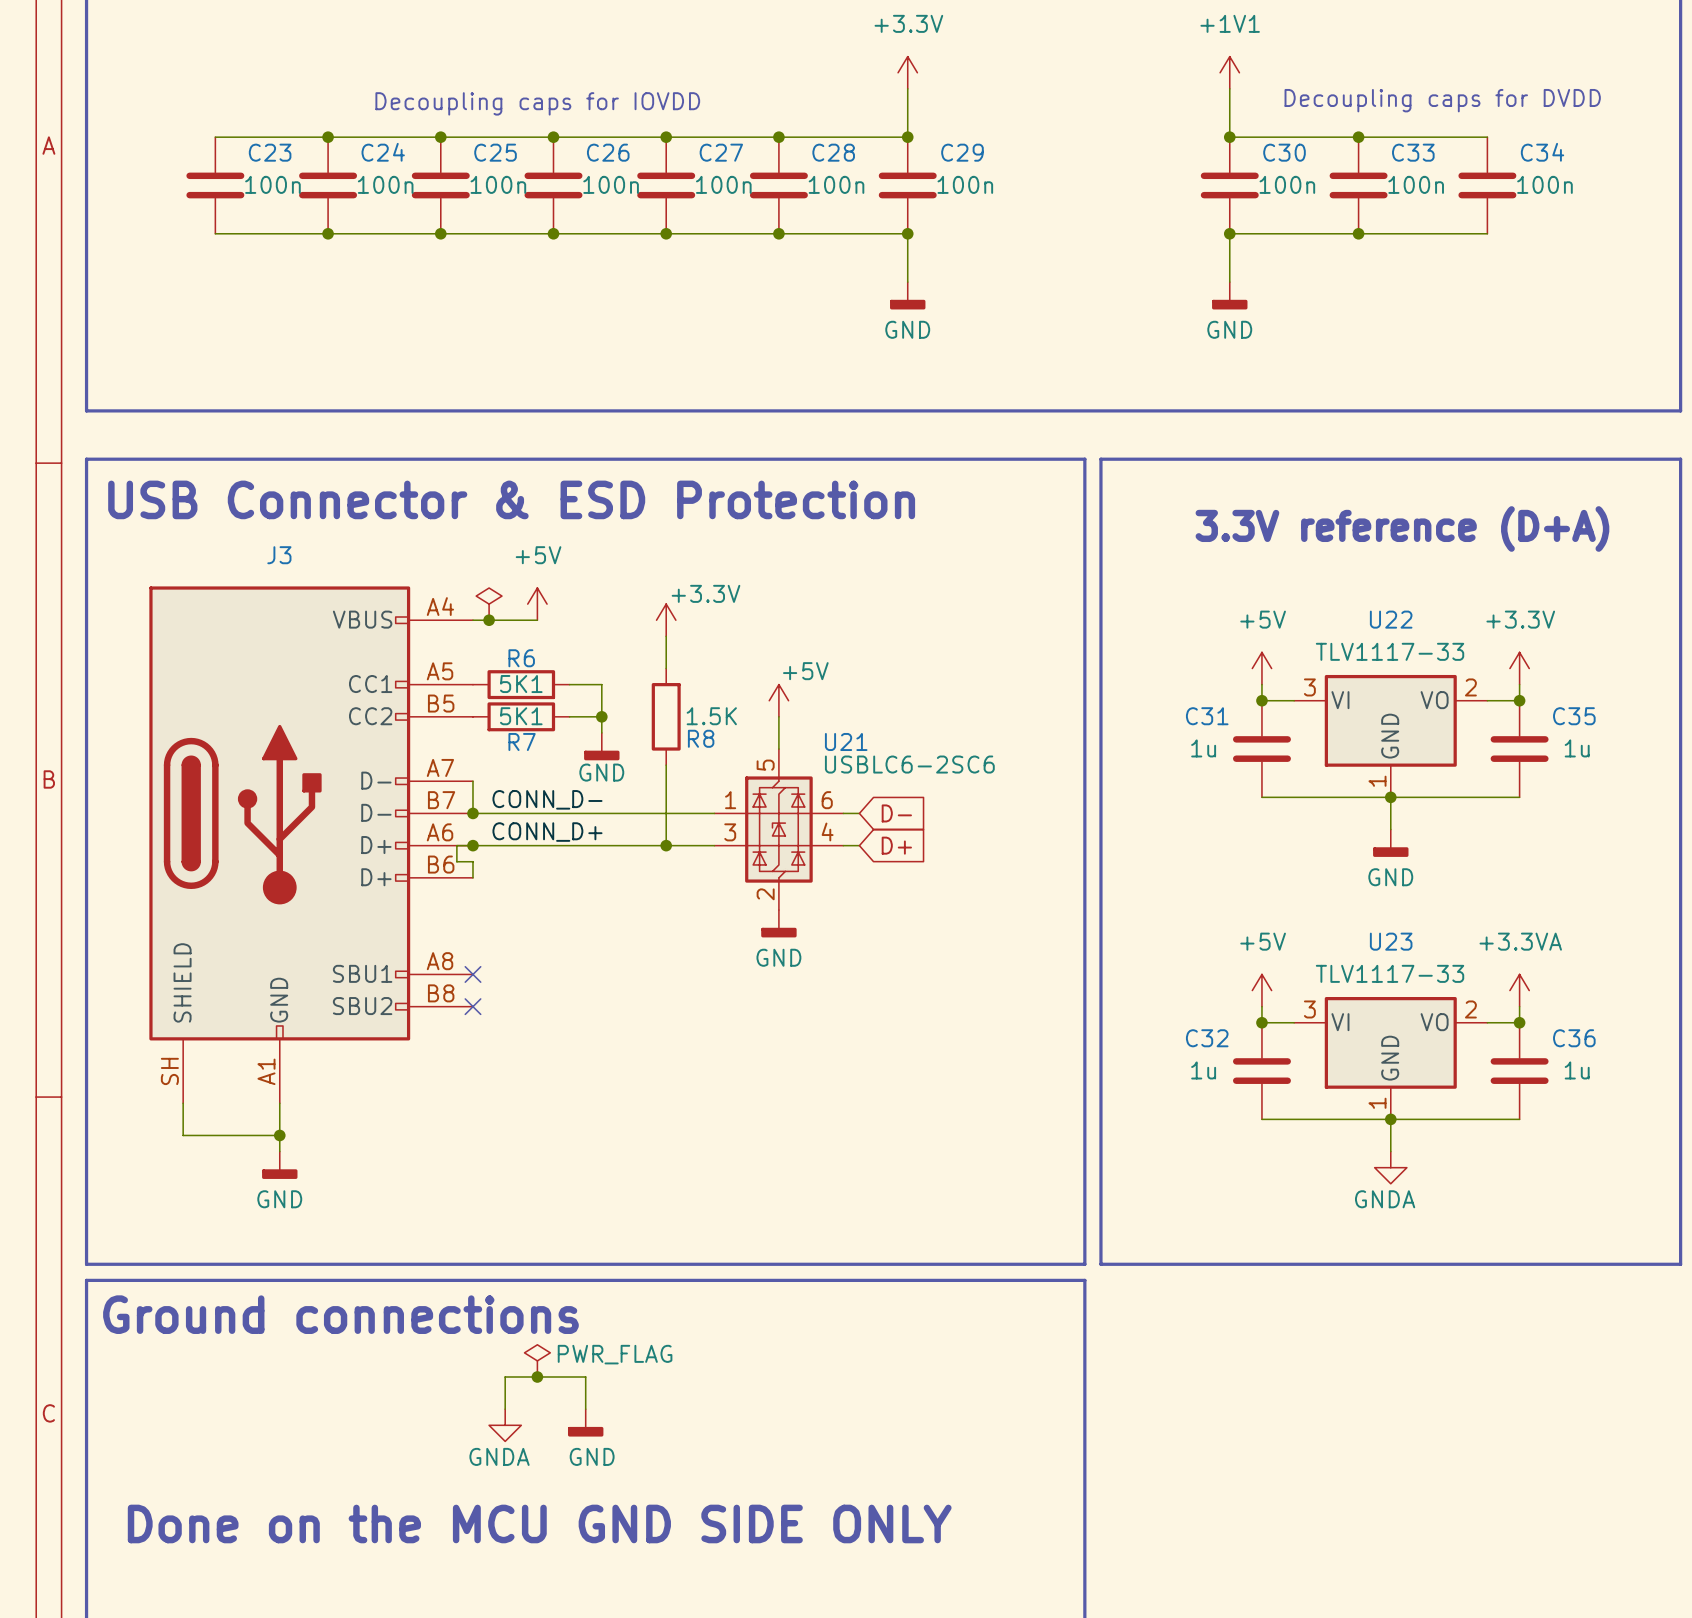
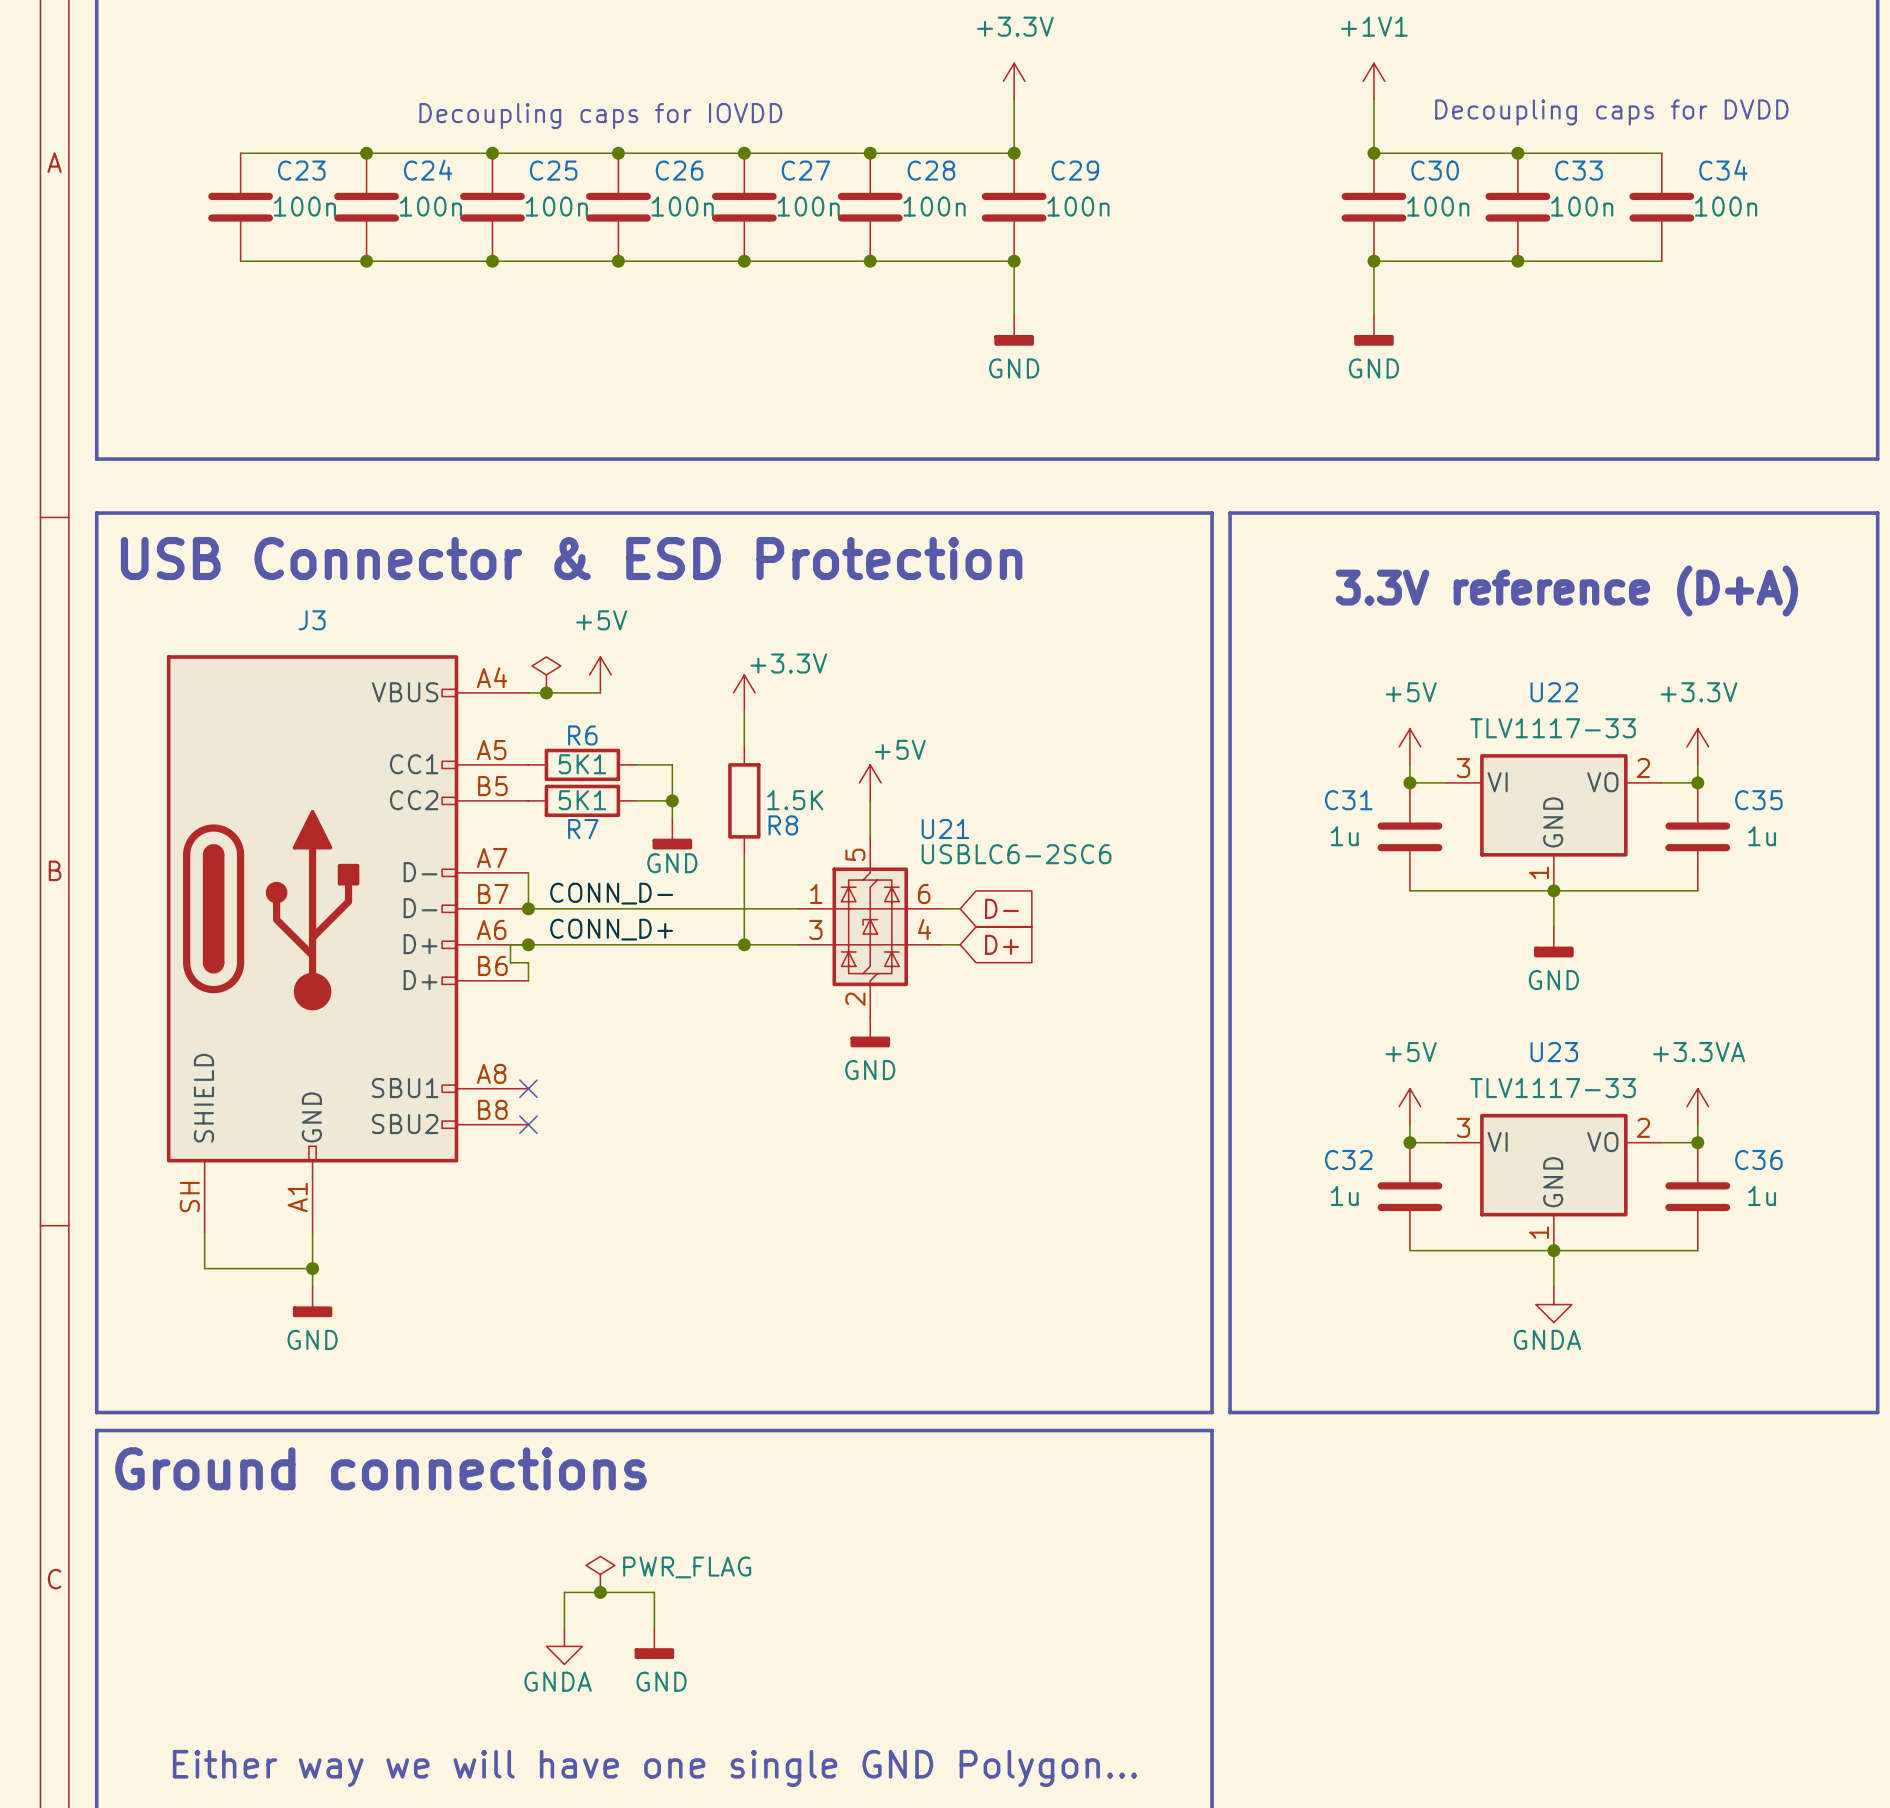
power symbol position: PWR_FLAG (537, 1360) -> PWR_FLAG (600, 1574)
junction position: (537, 1377) -> (600, 1592)
wire: (505, 1409) (505, 1377) (585, 1377) (585, 1409) -> (564, 1628) (564, 1592) (654, 1592) (654, 1628)
power symbol position: GND (585, 1422) -> GND (654, 1643)
power symbol position: GNDA (505, 1425) -> GNDA (564, 1646)
text: Done on the MCU GND SIDE ONLY (539, 1523) -> none
text: none -> Either way we will have one single GND Polygon... (654, 1768)

